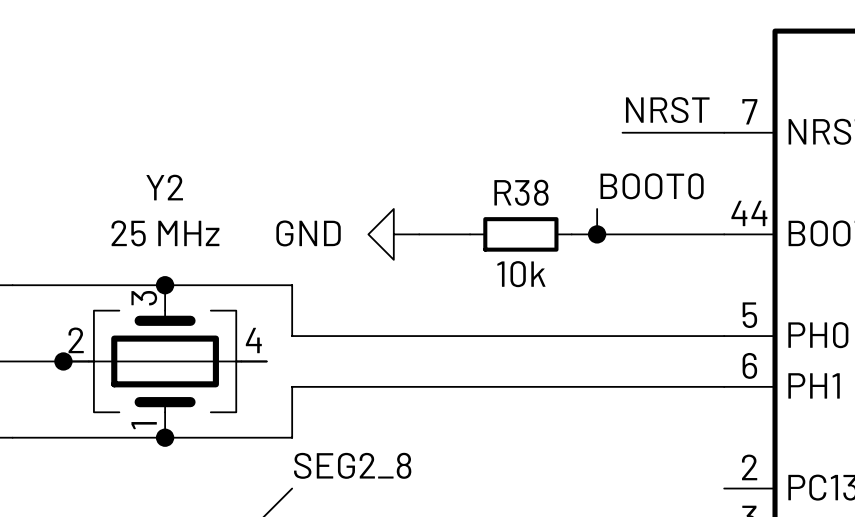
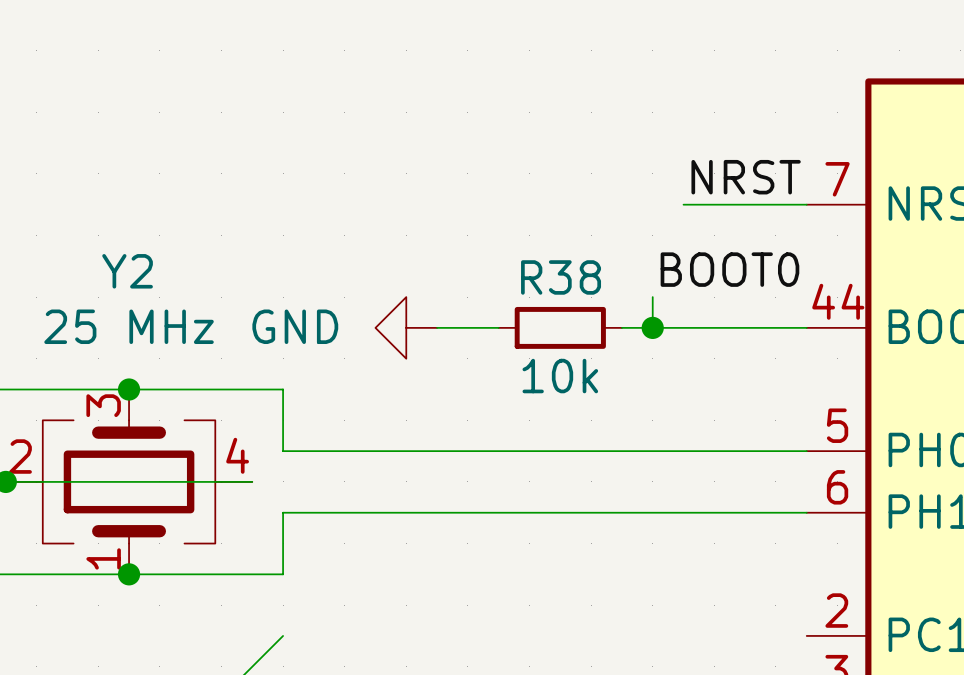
label: SEG2_8 (352, 465) -> none

